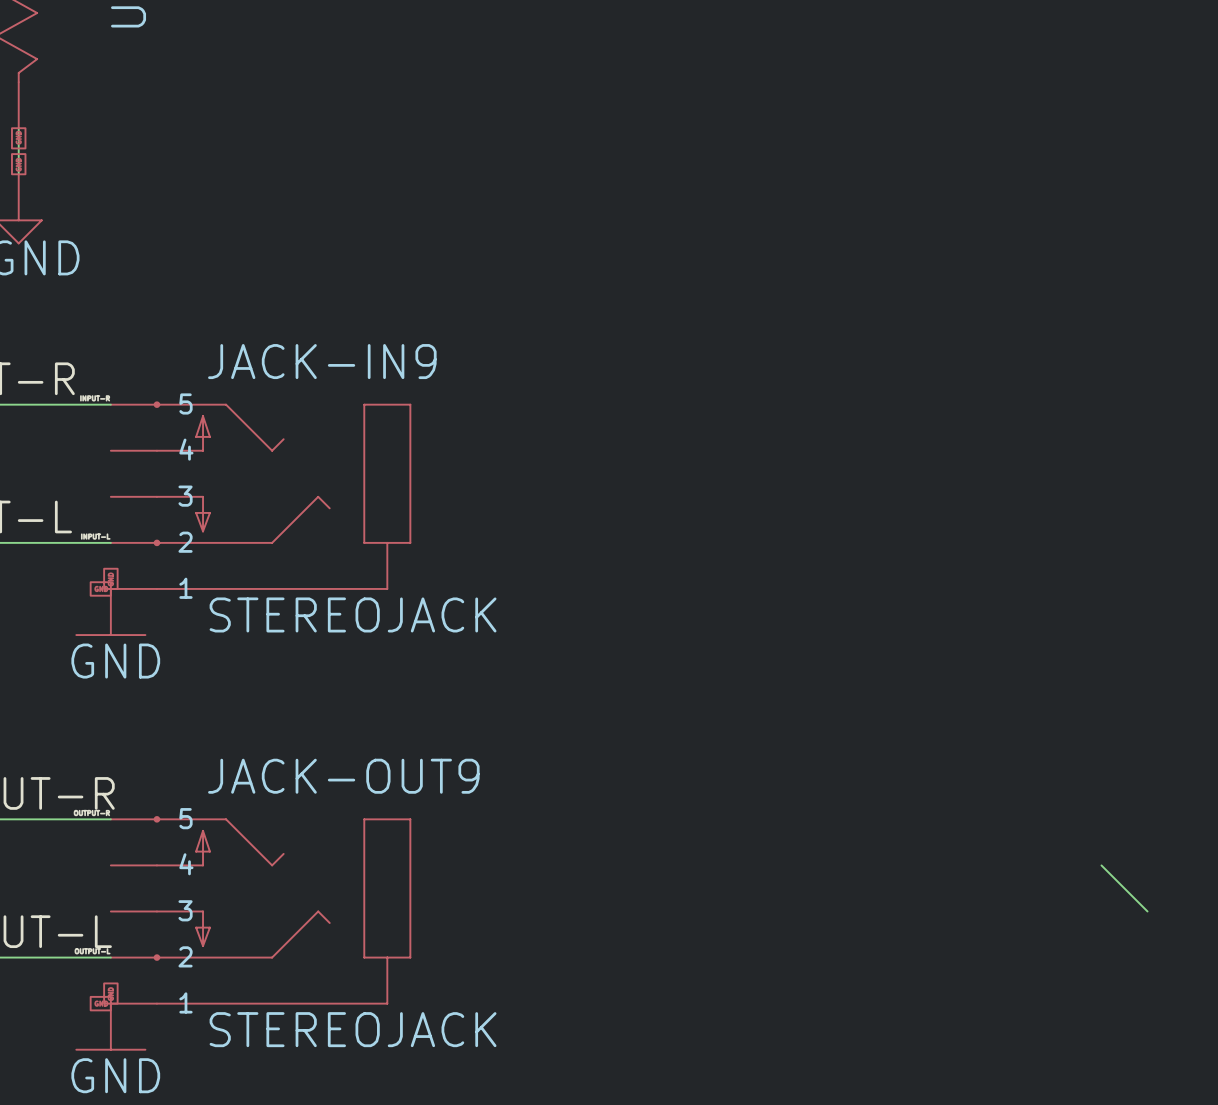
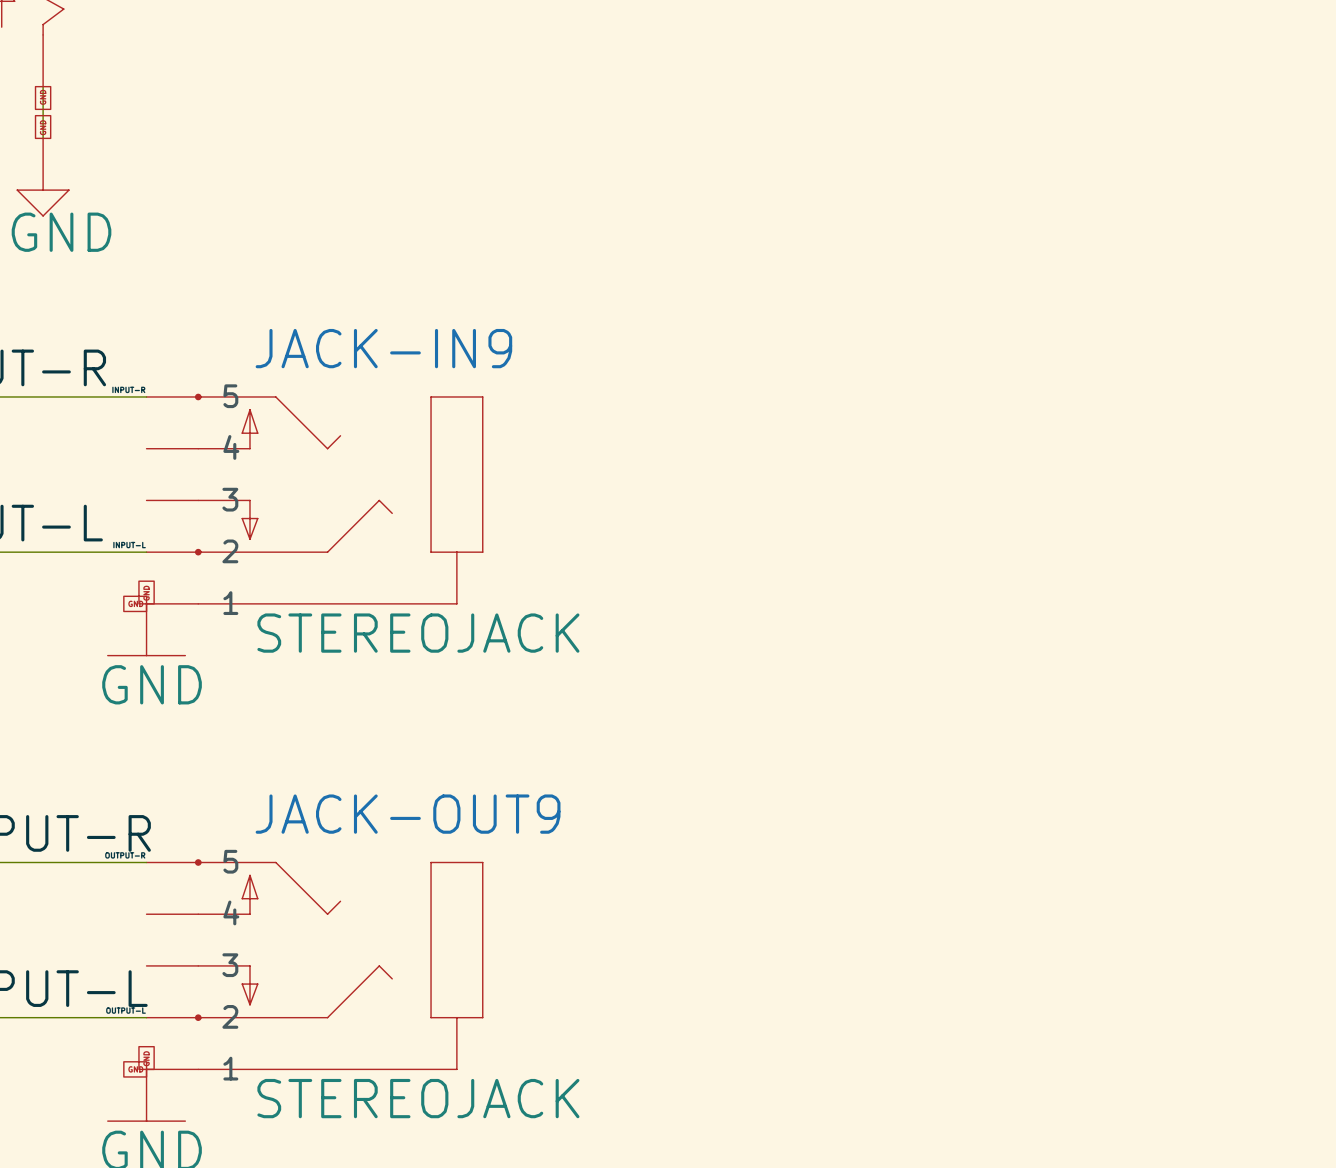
wire: (1101, 865) (1147, 911) -> none

